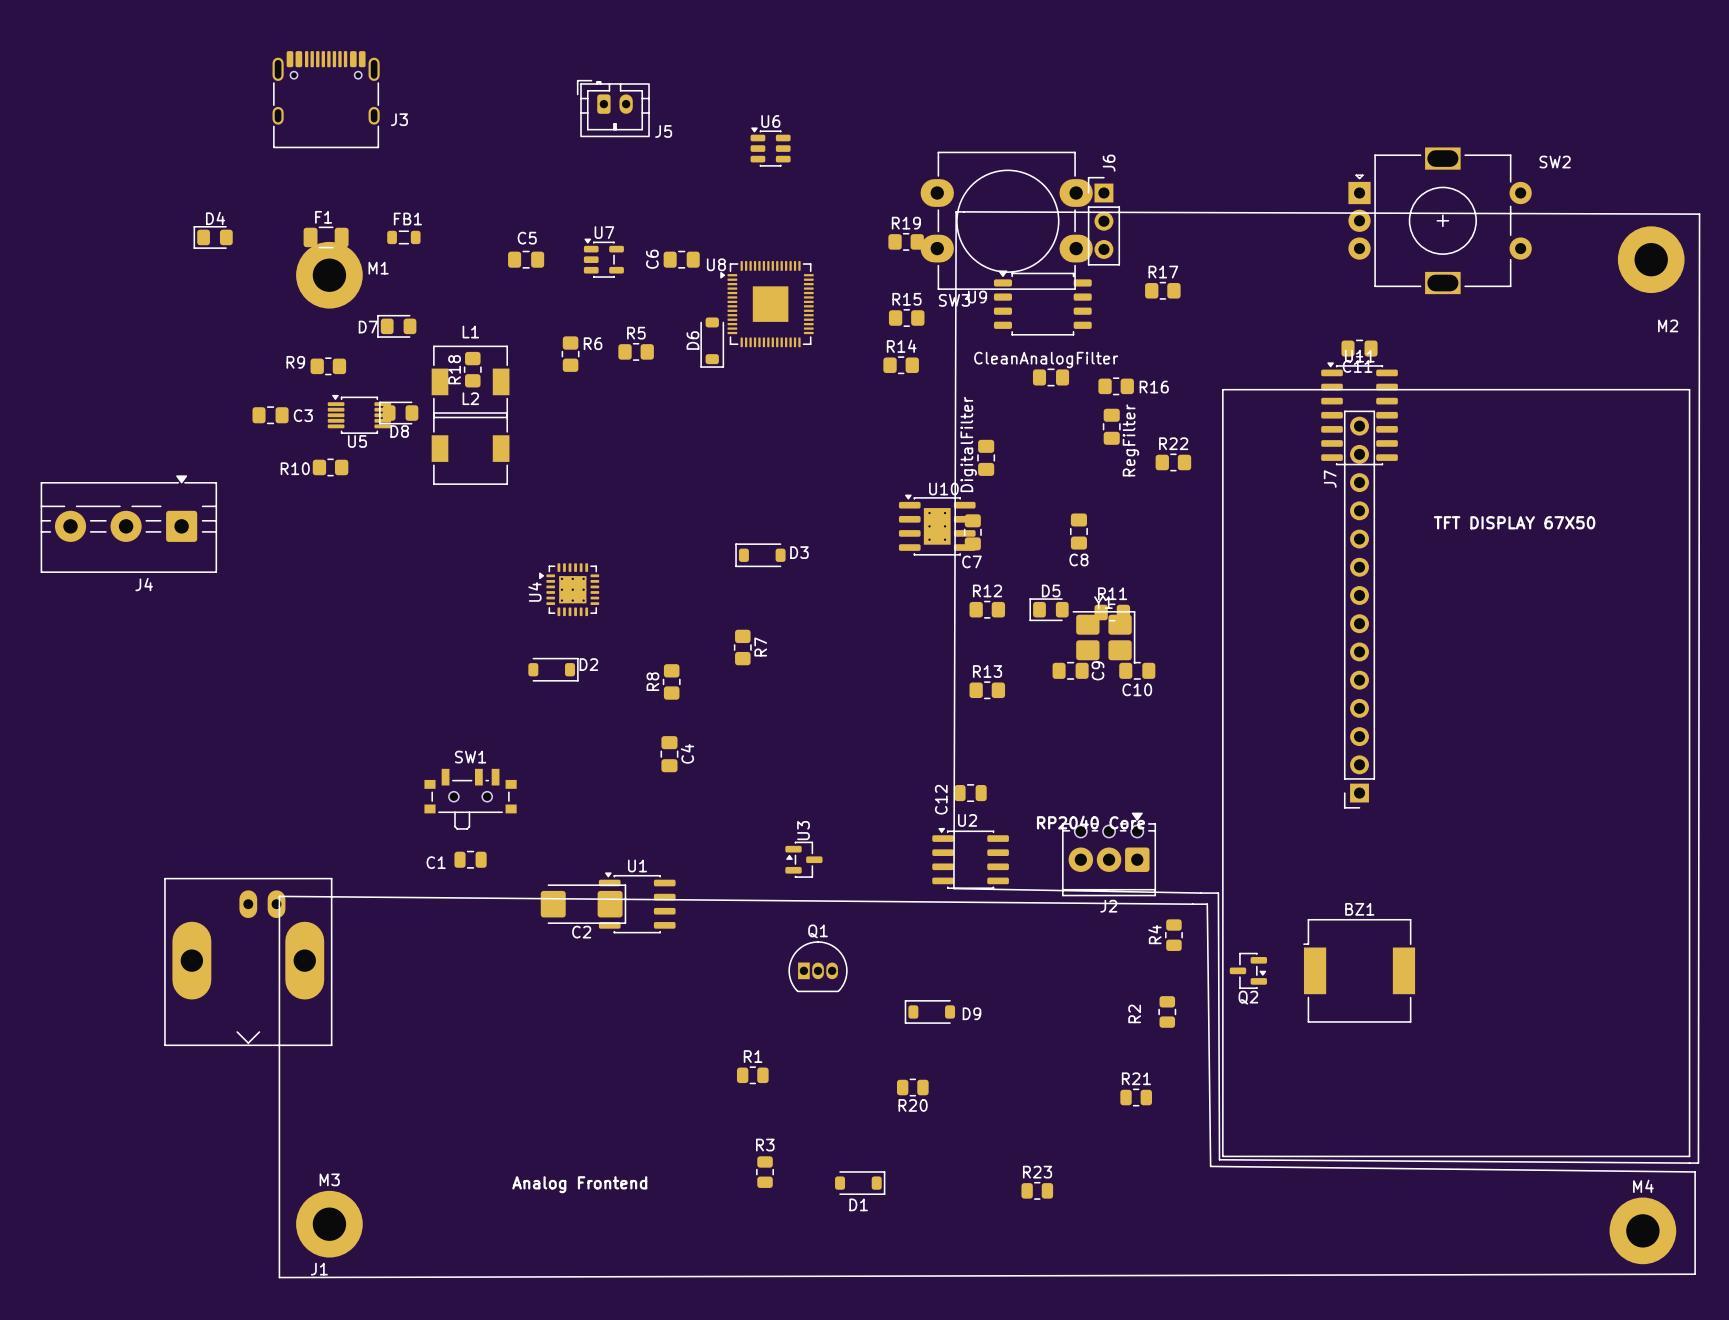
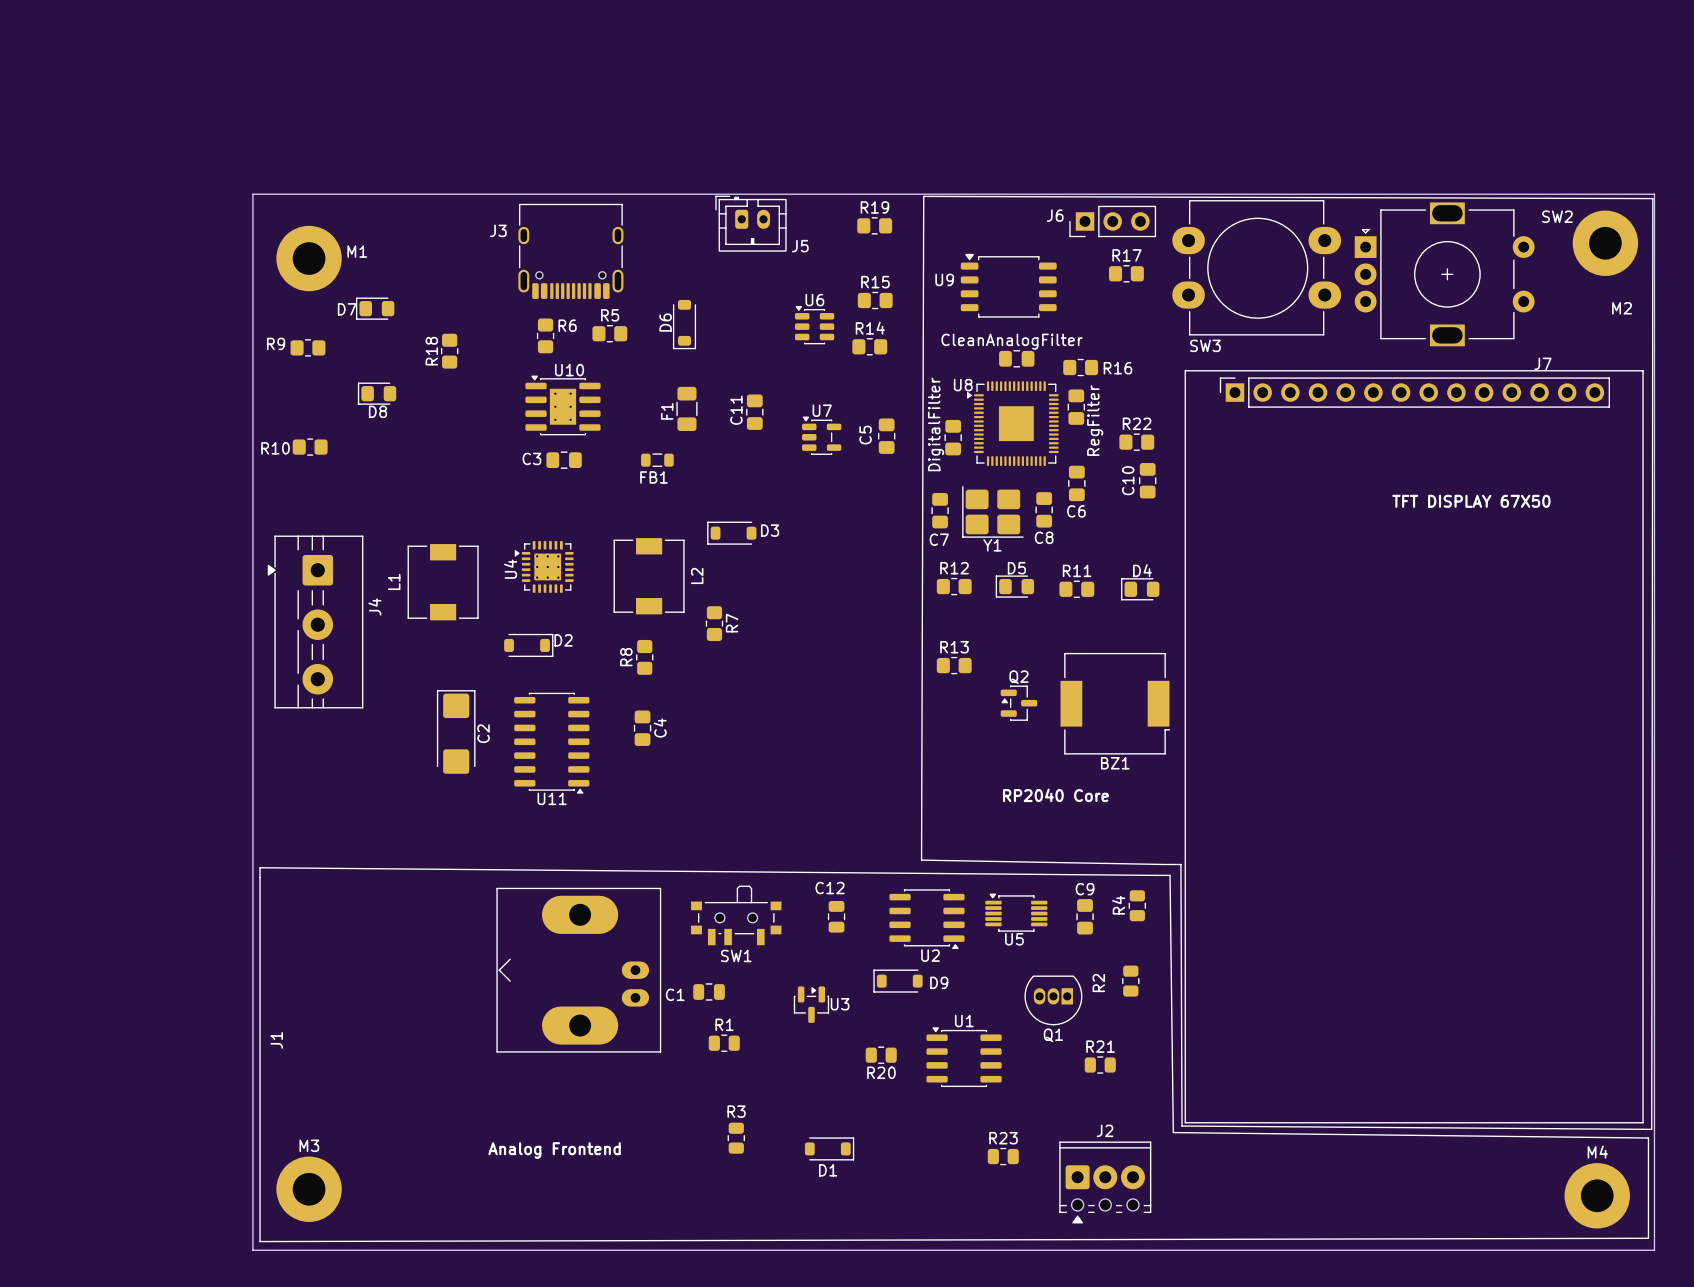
J3 rotation: 0° (326, 99) -> 180° (570, 251)
J3 position: (326, 99) -> (570, 251)
J5 position: (613, 108) -> (750, 223)
U6 position: (770, 147) -> (814, 325)
board edge: none -> (252, 194) (1654, 194) (1654, 1250) (252, 1250) (252, 194)
F1 name position: F1 (323, 217) -> F1 (667, 411)
FB1 name position: FB1 (407, 218) -> FB1 (653, 477)
SW3 position: (1006, 220) -> (1256, 267)
SW2 position: (1440, 220) -> (1444, 274)
J6 rotation: 0° (1103, 221) -> 90° counterclockwise (1112, 221)
D4 position: (213, 237) -> (1140, 589)
F1 rotation: 0° (326, 237) -> 90° clockwise (686, 408)
F1 position: (326, 237) -> (686, 408)
FB1 position: (403, 237) -> (657, 460)
C5 name position: C5 (527, 238) -> C5 (865, 435)
U7 position: (603, 258) -> (821, 435)
C5 rotation: 0° (526, 259) -> 90° clockwise (886, 436)
C5 position: (526, 259) -> (886, 436)
C6 name position: C6 (652, 259) -> C6 (1076, 511)
C6 rotation: 0° (681, 259) -> 90° clockwise (1076, 483)
C6 position: (681, 259) -> (1076, 483)
U8 position: (766, 304) -> (1012, 423)
L1 name position: L1 (470, 332) -> L1 (394, 581)
C11 rotation: 0° (1359, 348) -> 90° clockwise (754, 412)
C11 position: (1359, 348) -> (754, 412)
L1 rotation: 0° (470, 381) -> 90° clockwise (443, 582)
L1 position: (470, 381) -> (443, 582)
U11 rotation: 0° (1359, 413) -> 180° (551, 743)
U11 position: (1359, 413) -> (551, 743)
U5 position: (359, 414) -> (1016, 912)
C3 position: (270, 415) -> (564, 460)
C3 name position: C3 (303, 415) -> C3 (531, 458)
L2 rotation: 0° (470, 448) -> 90° clockwise (649, 576)
L2 position: (470, 448) -> (649, 576)
J4 rotation: 0° (128, 524) -> 90° counterclockwise (315, 621)
J4 position: (128, 524) -> (315, 621)
U10 position: (937, 525) -> (562, 405)
J7 rotation: 0° (1359, 609) -> 90° clockwise (1414, 392)
Y1 rotation: 0° (1103, 637) -> 180° (992, 511)
Y1 position: (1103, 637) -> (992, 511)
C9 rotation: 0° (1070, 670) -> 90° clockwise (1085, 916)
C9 position: (1070, 670) -> (1085, 916)
C9 name position: C9 (1097, 670) -> C9 (1085, 889)
C10 rotation: 0° (1137, 670) -> 90° clockwise (1147, 480)
C10 position: (1137, 670) -> (1147, 480)
C12 rotation: 0° (970, 793) -> 90° clockwise (836, 916)
C12 position: (970, 793) -> (836, 916)
SW1 rotation: 0° (470, 799) -> 180° (736, 915)
SW1 position: (470, 799) -> (736, 915)
J2 rotation: 0° (1109, 854) -> 180° (1105, 1182)
J2 position: (1109, 854) -> (1105, 1182)
U2 rotation: 0° (970, 858) -> 180° (927, 919)
U2 position: (970, 858) -> (927, 919)
C1 position: (470, 859) -> (709, 991)
U3 rotation: 0° (803, 859) -> 90° clockwise (811, 1004)
U3 position: (803, 859) -> (811, 1004)
U1 position: (637, 902) -> (964, 1057)
C2 rotation: 0° (583, 904) -> 90° counterclockwise (456, 731)
C2 position: (583, 904) -> (456, 731)
J1 rotation: 0° (248, 961) -> 90° clockwise (578, 970)
J1 position: (248, 961) -> (578, 970)
Q1 rotation: 0° (818, 966) -> 180° (1053, 1000)
Q1 position: (818, 966) -> (1053, 1000)
Q2 rotation: 0° (1248, 970) -> 180° (1018, 703)
Q2 position: (1248, 970) -> (1018, 703)
BZ1 rotation: 0° (1359, 970) -> 180° (1115, 703)
BZ1 position: (1359, 970) -> (1115, 703)

